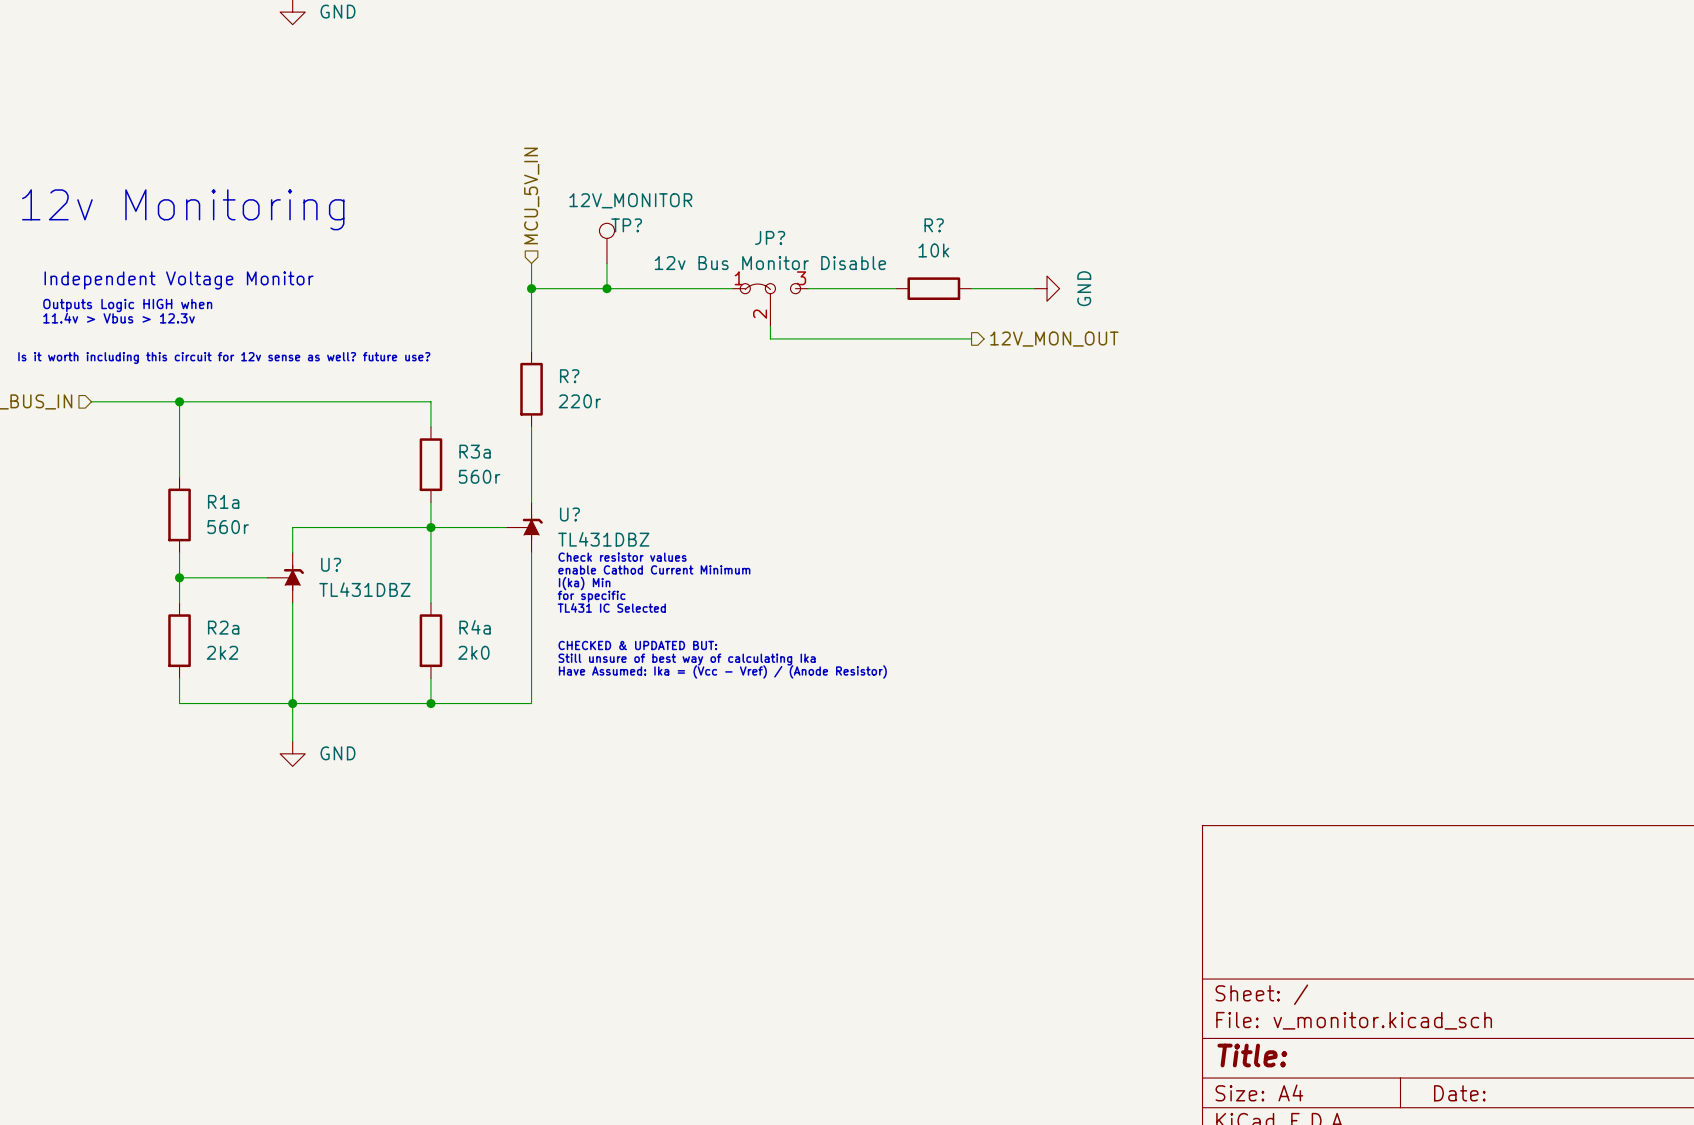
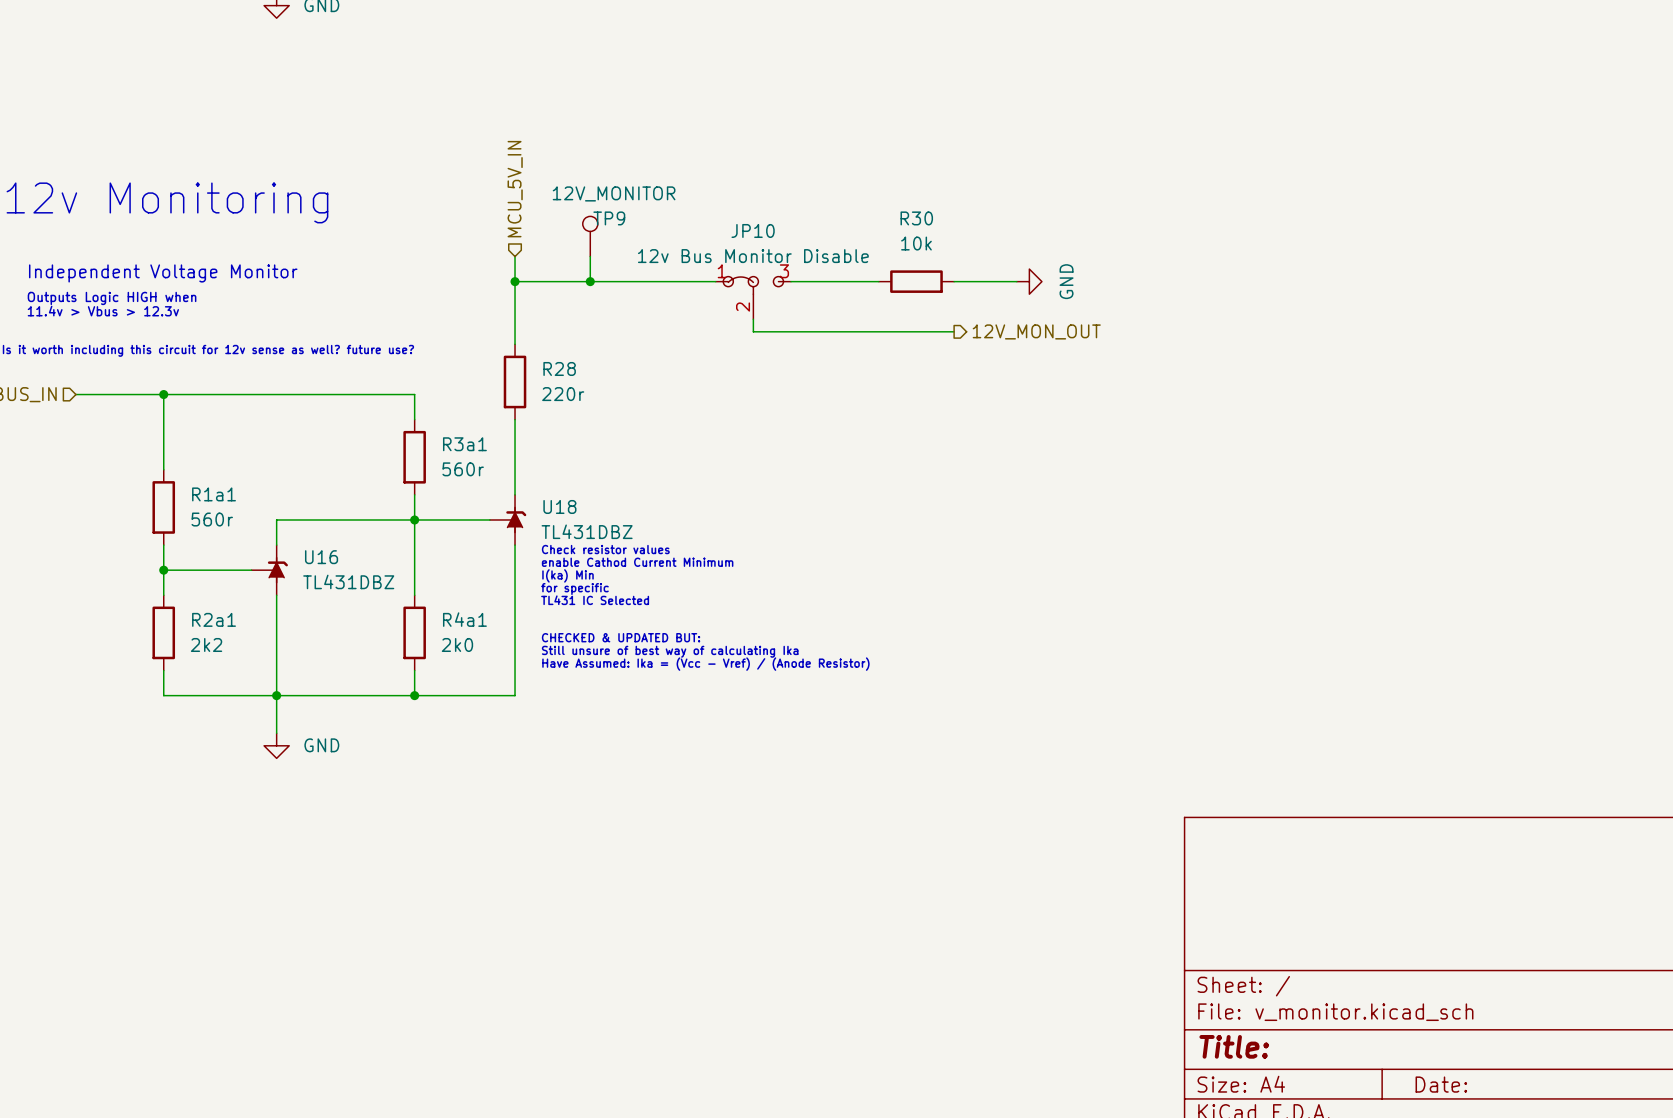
TP? name: TP? (626, 225) -> TP9 (609, 218)
R? name: R? (934, 225) -> R30 (916, 218)
JP? name: JP? (770, 237) -> JP10 (753, 230)
R? name: R? (569, 376) -> R28 (559, 368)
R3a name: R3a (475, 451) -> R3a1 (464, 444)
R1a name: R1a (223, 501) -> R1a1 (214, 494)
U? name: U? (569, 514) -> U18 (559, 506)
U? name: U? (331, 564) -> U16 (321, 557)
R2a name: R2a (223, 627) -> R2a1 (214, 619)
R4a name: R4a (475, 627) -> R4a1 (464, 619)

